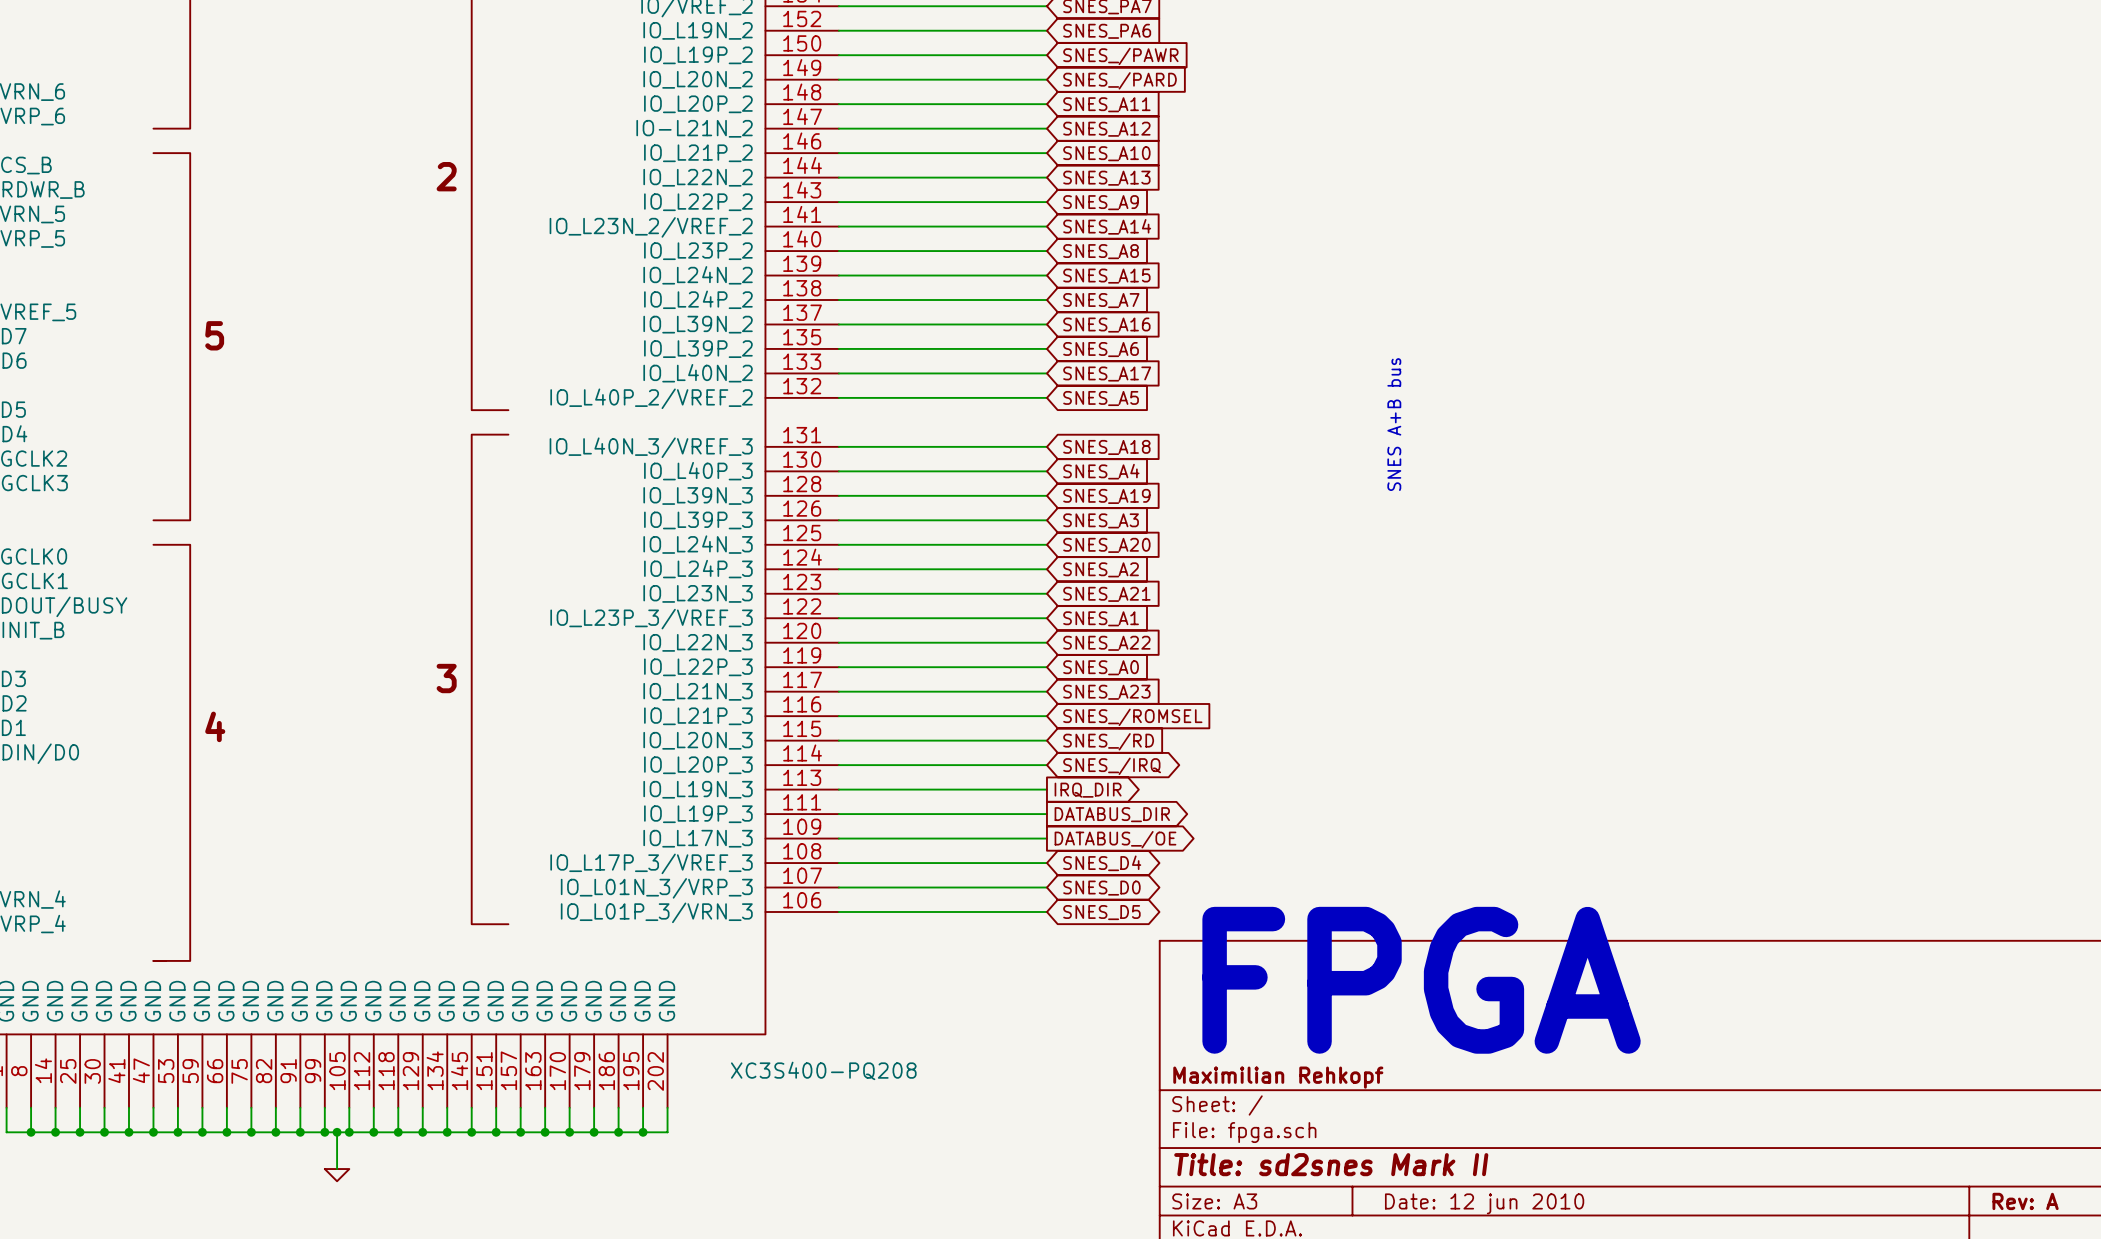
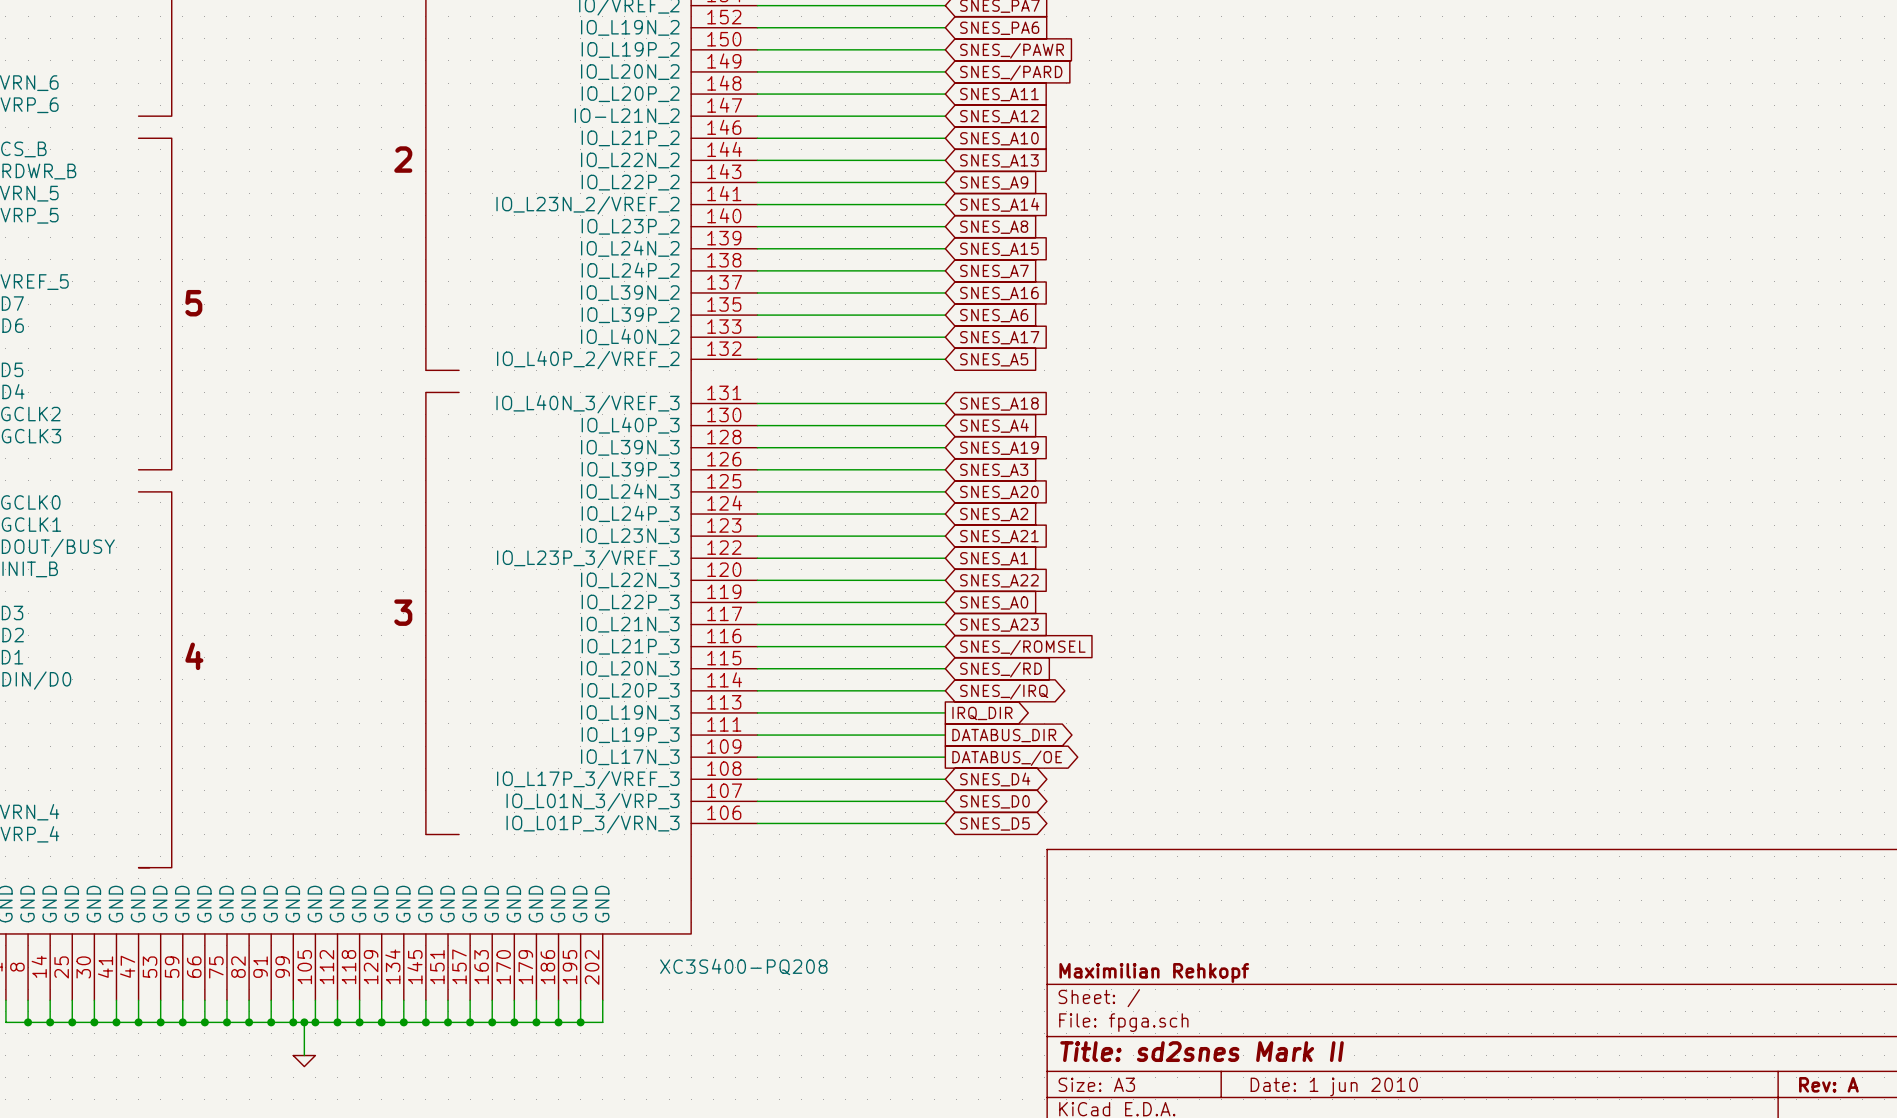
text: SNES A+B bus (1394, 424) -> none
text: FPGA (1421, 980) -> none
title block: Date: 12 jun 2010 (1484, 1203) -> Date: 1 jun 2010 (1334, 1086)

